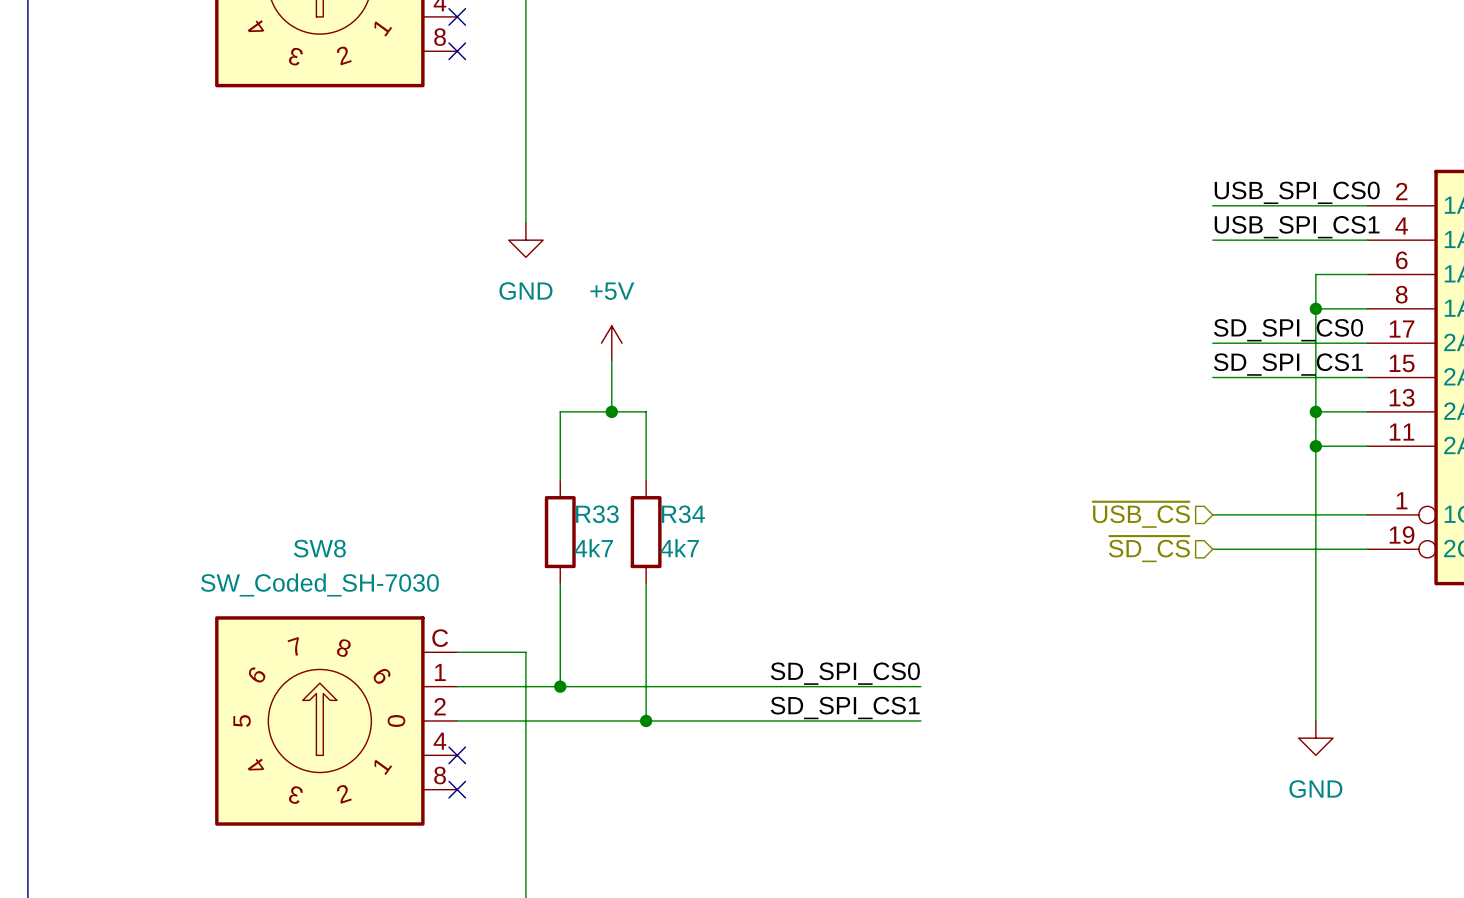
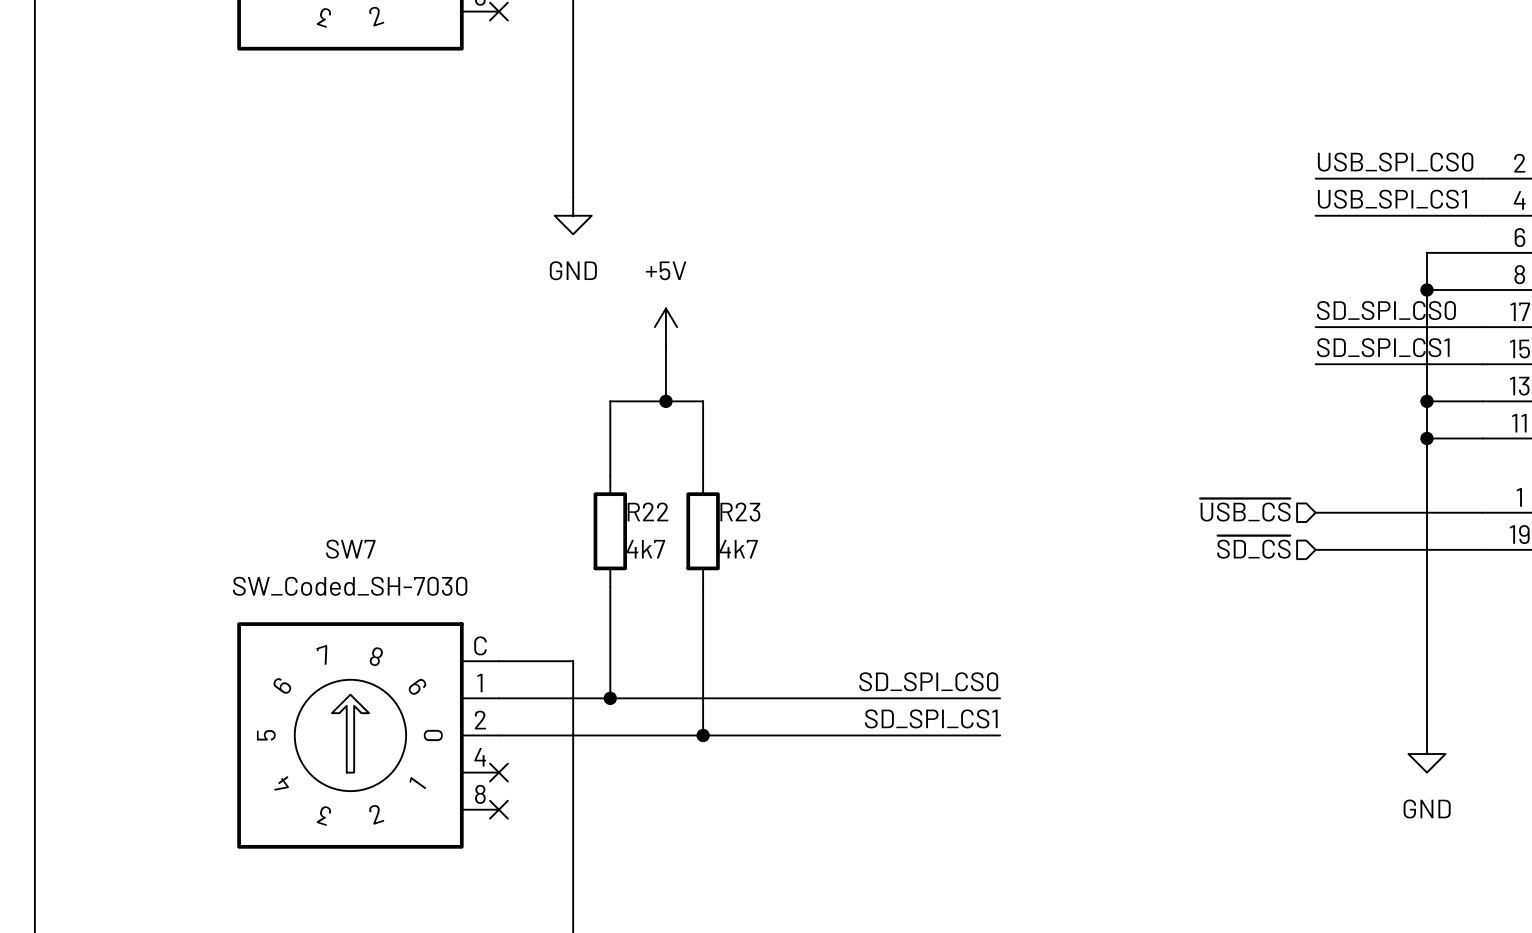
R33 name: R33 (597, 514) -> R22 (647, 511)
R34 name: R34 (683, 514) -> R23 (740, 512)
SW8 name: SW8 (319, 548) -> SW7 (350, 549)

